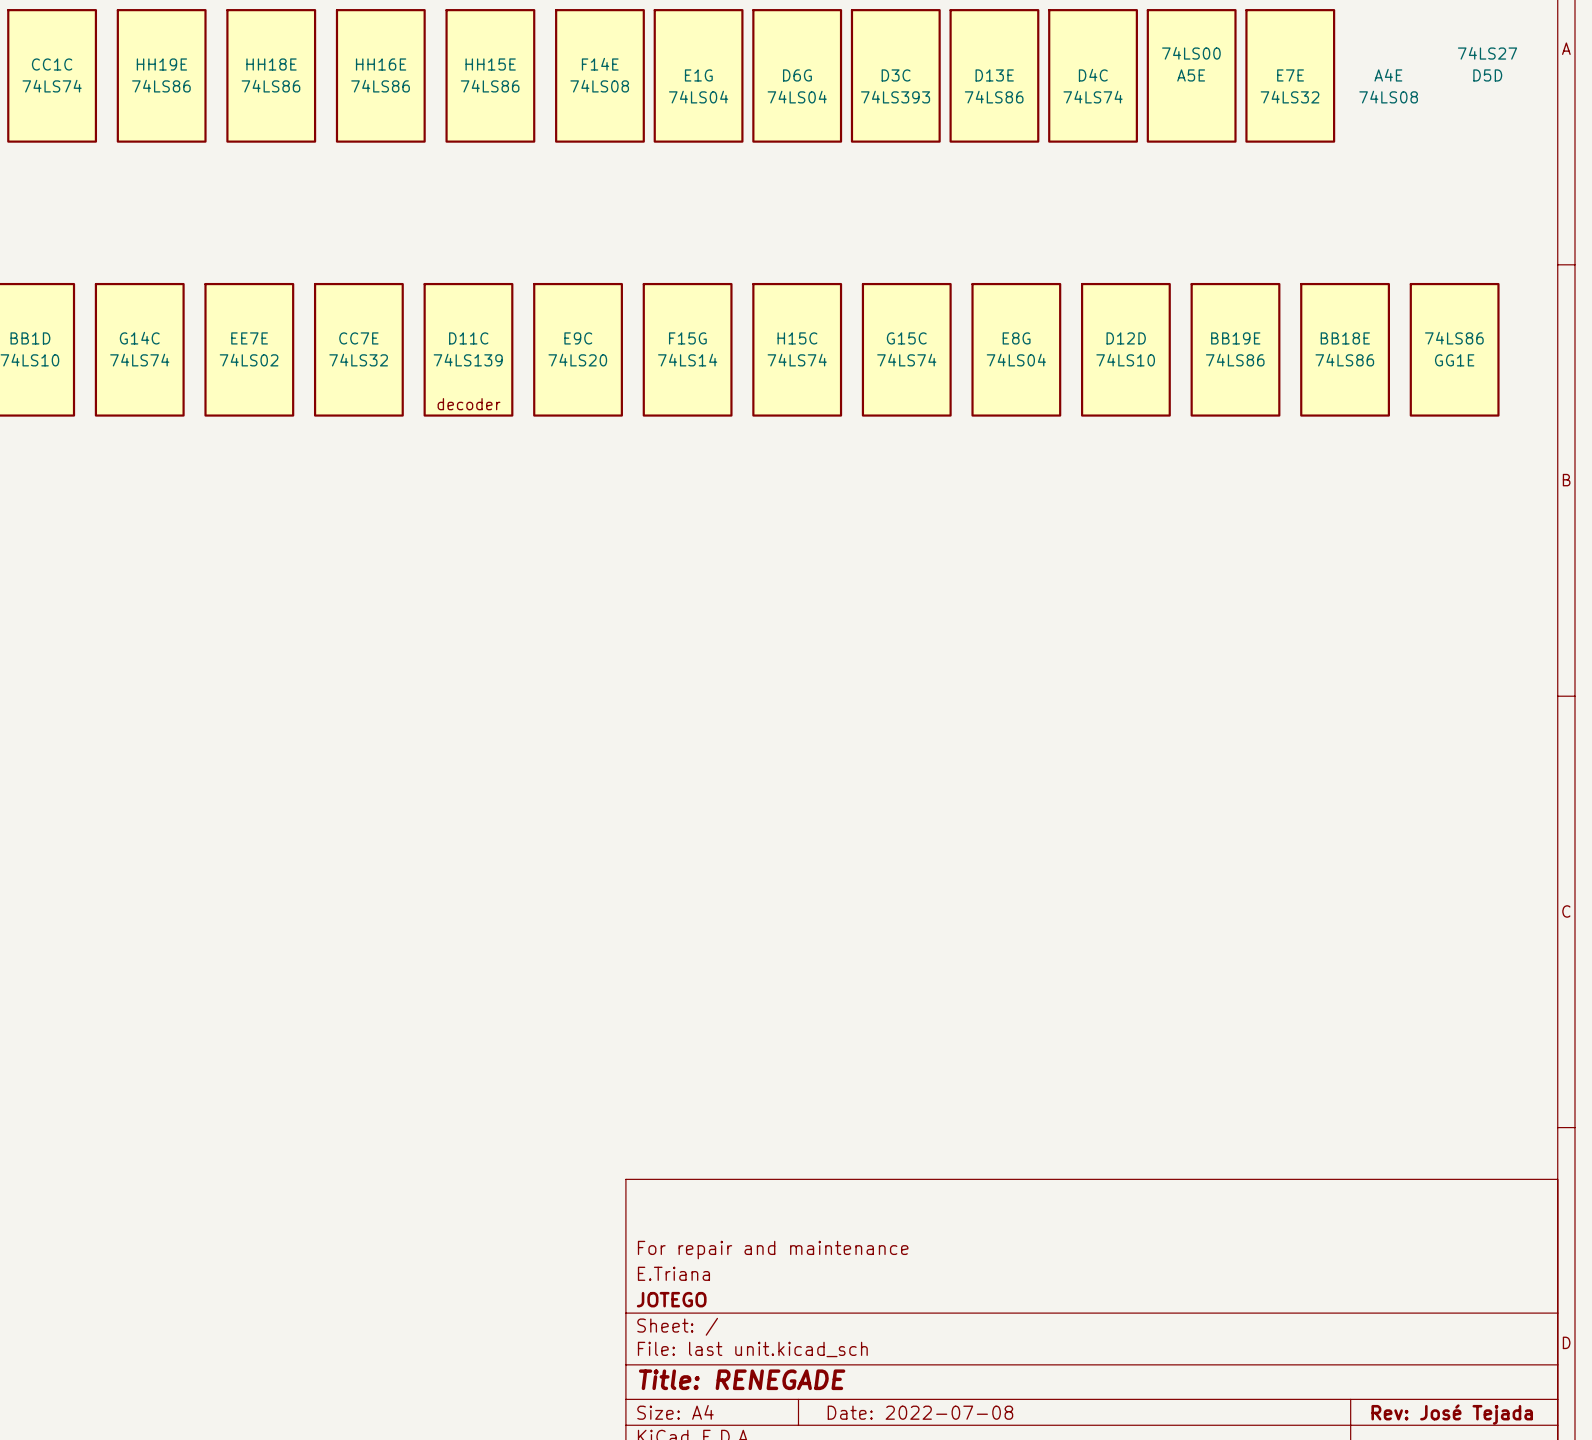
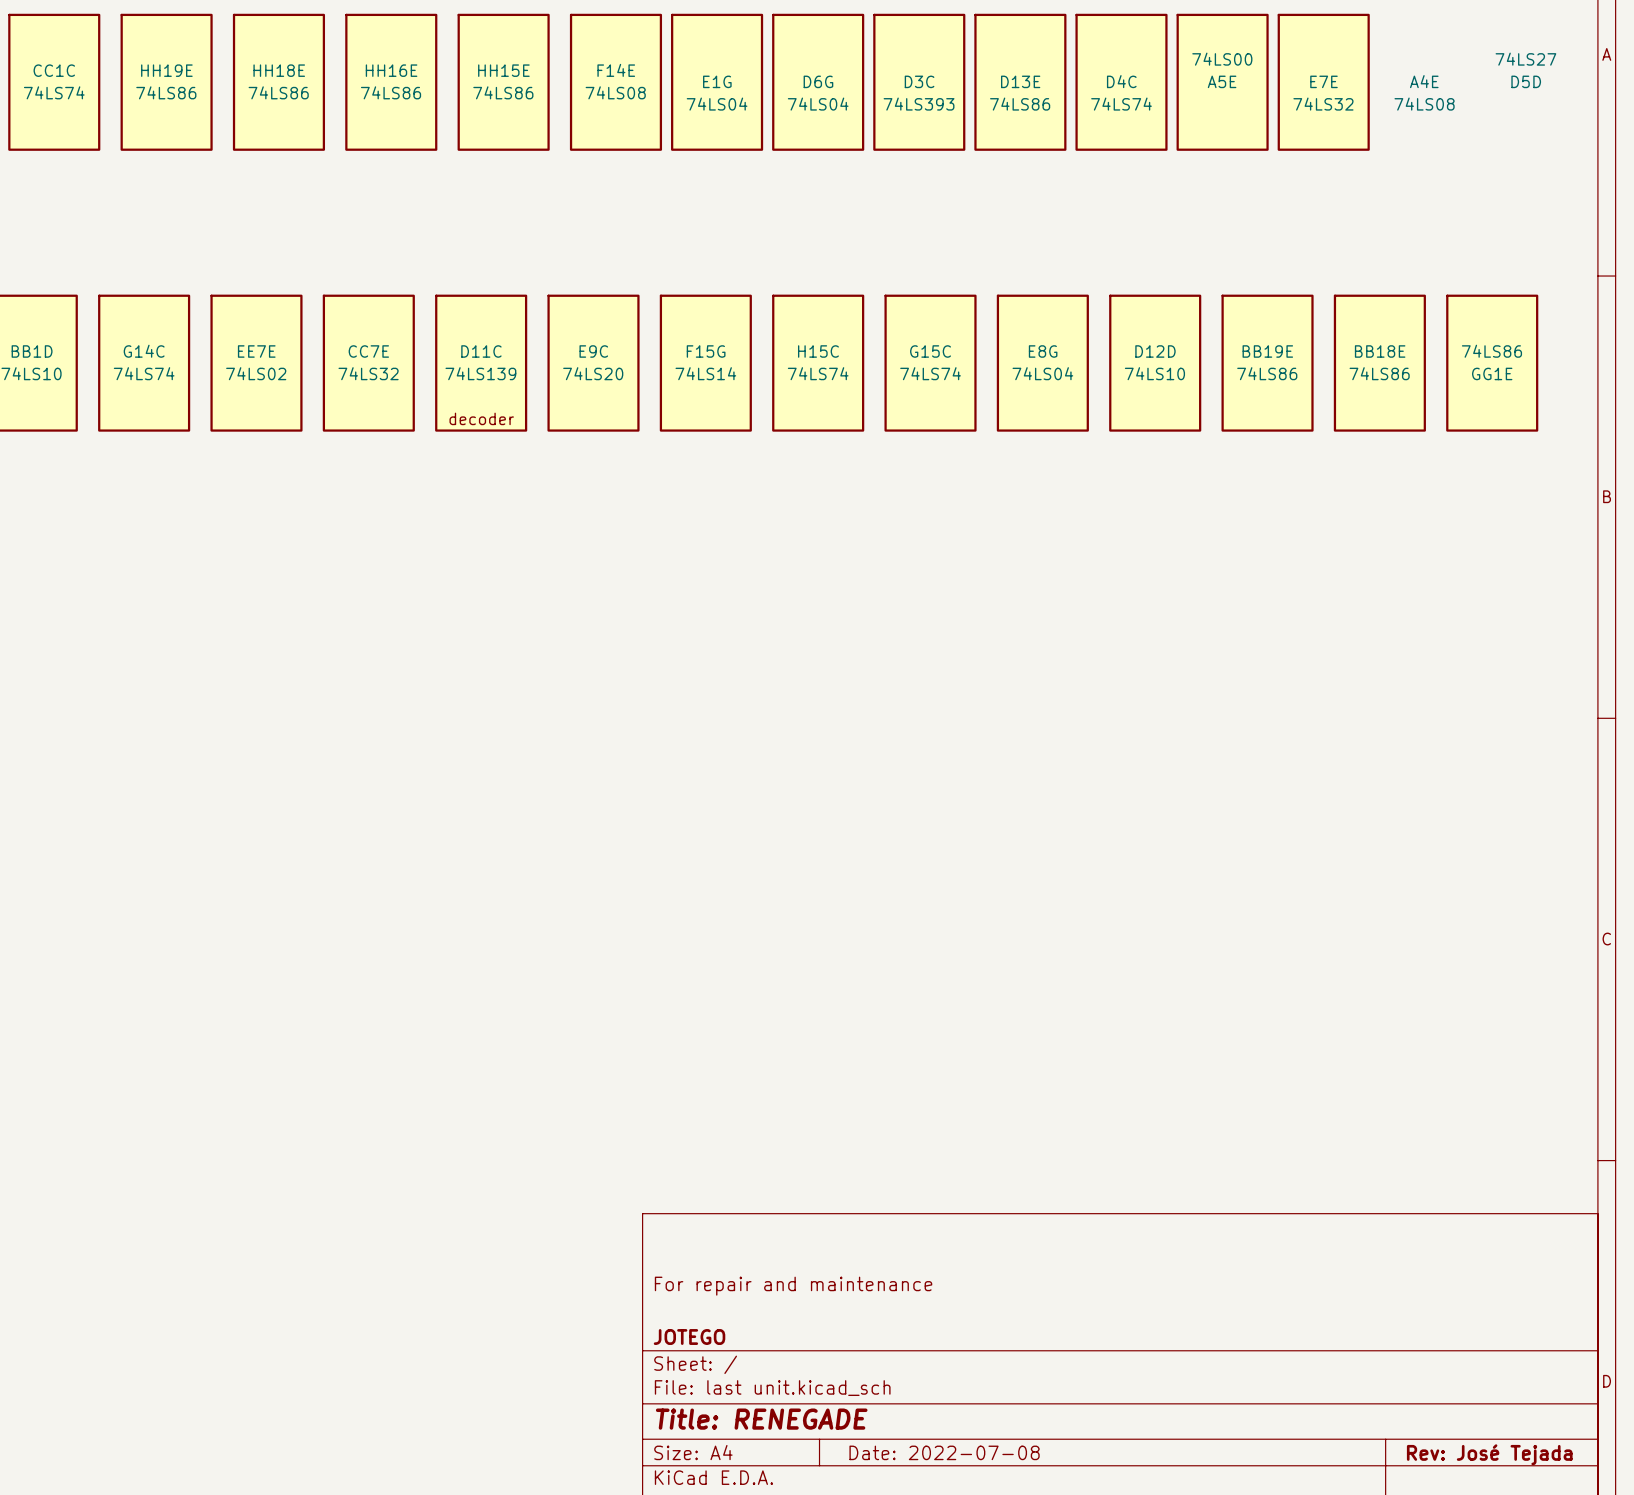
title block: E.Triana (673, 1273) -> none

